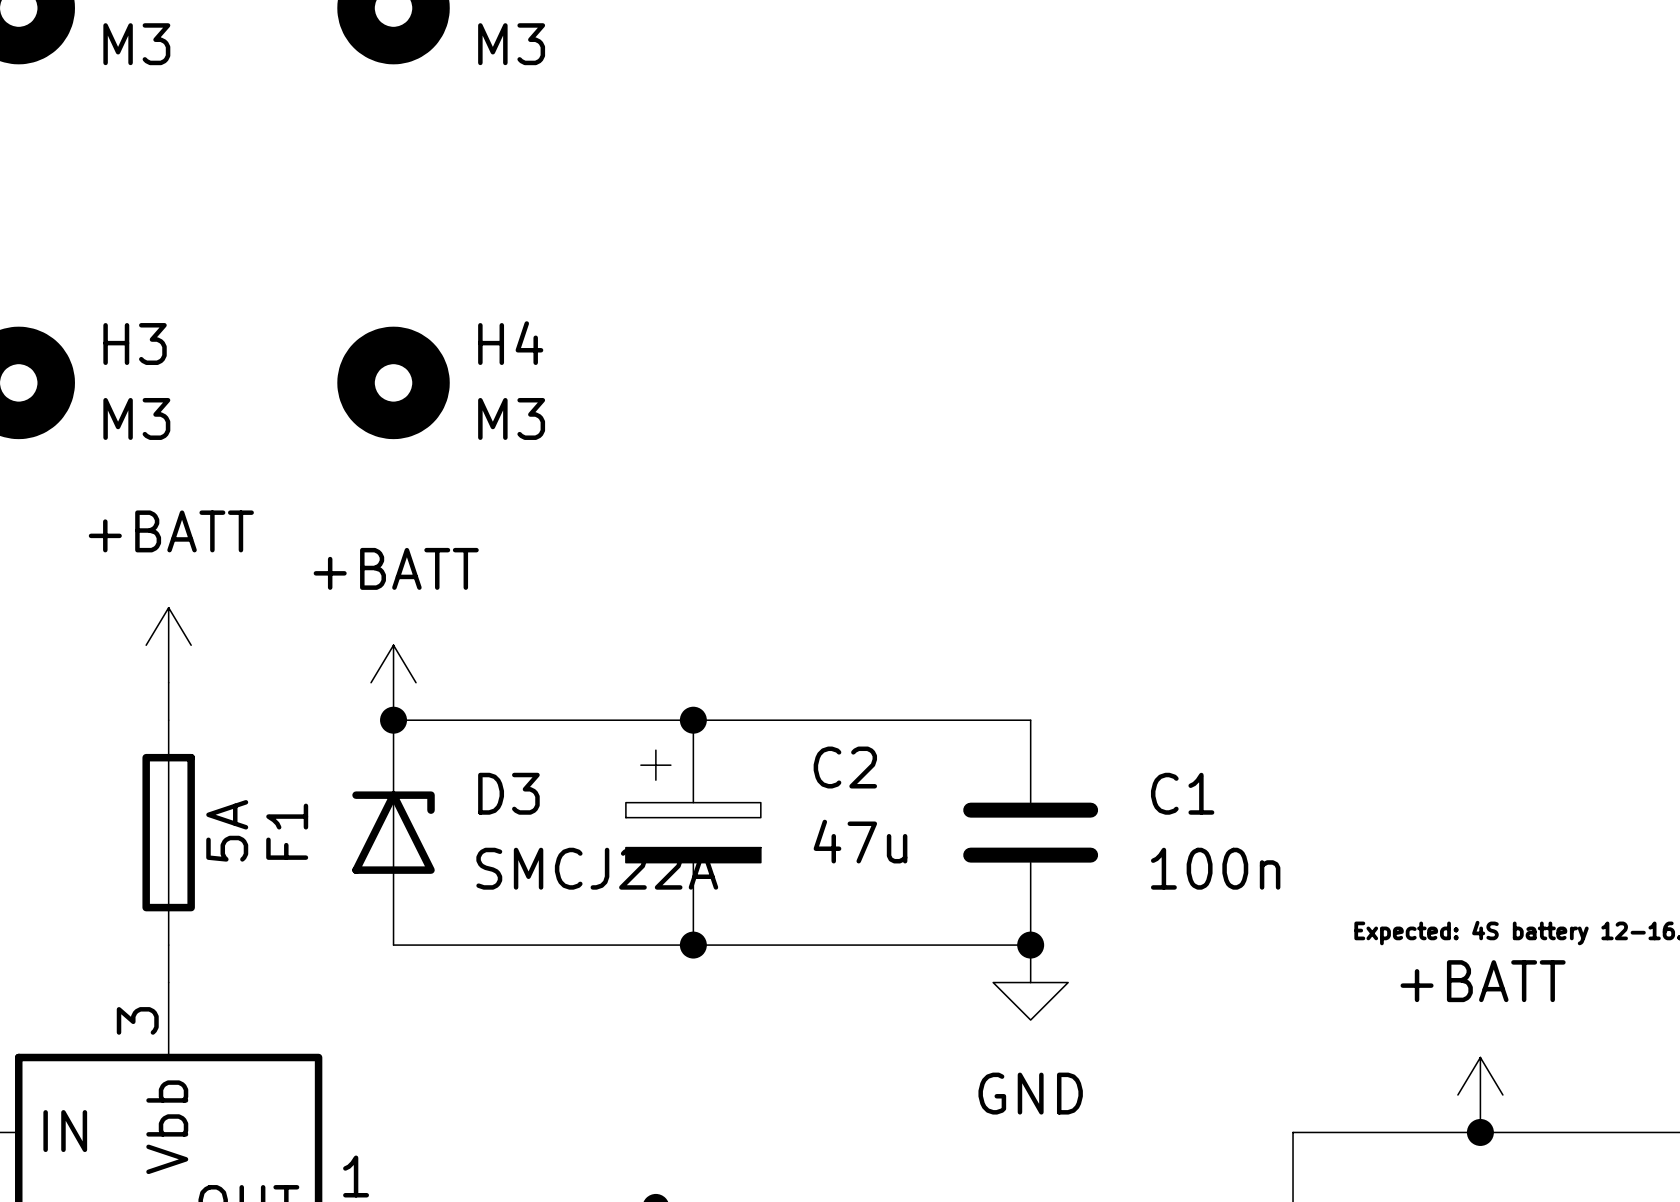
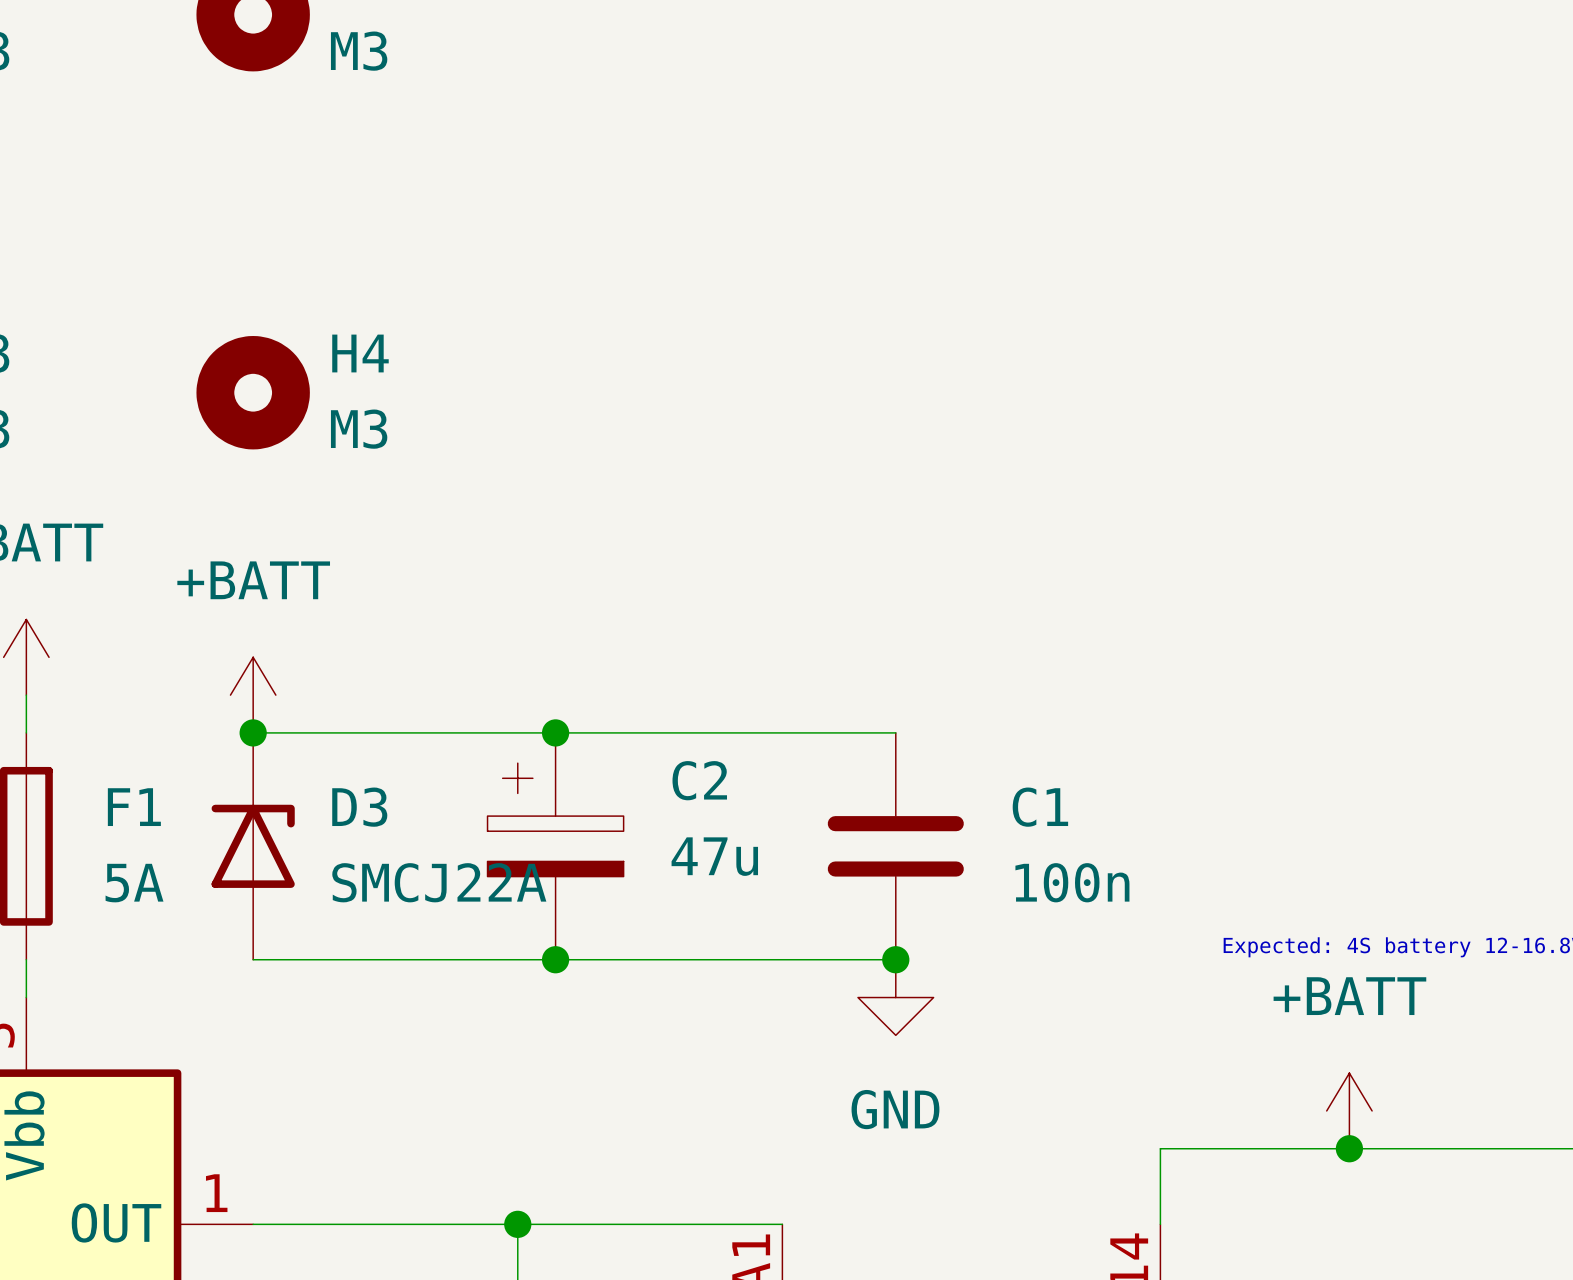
F1 value rotation: 0° (227, 830) -> 90° clockwise (134, 883)
F1 name rotation: 0° (287, 831) -> 90° clockwise (134, 807)

